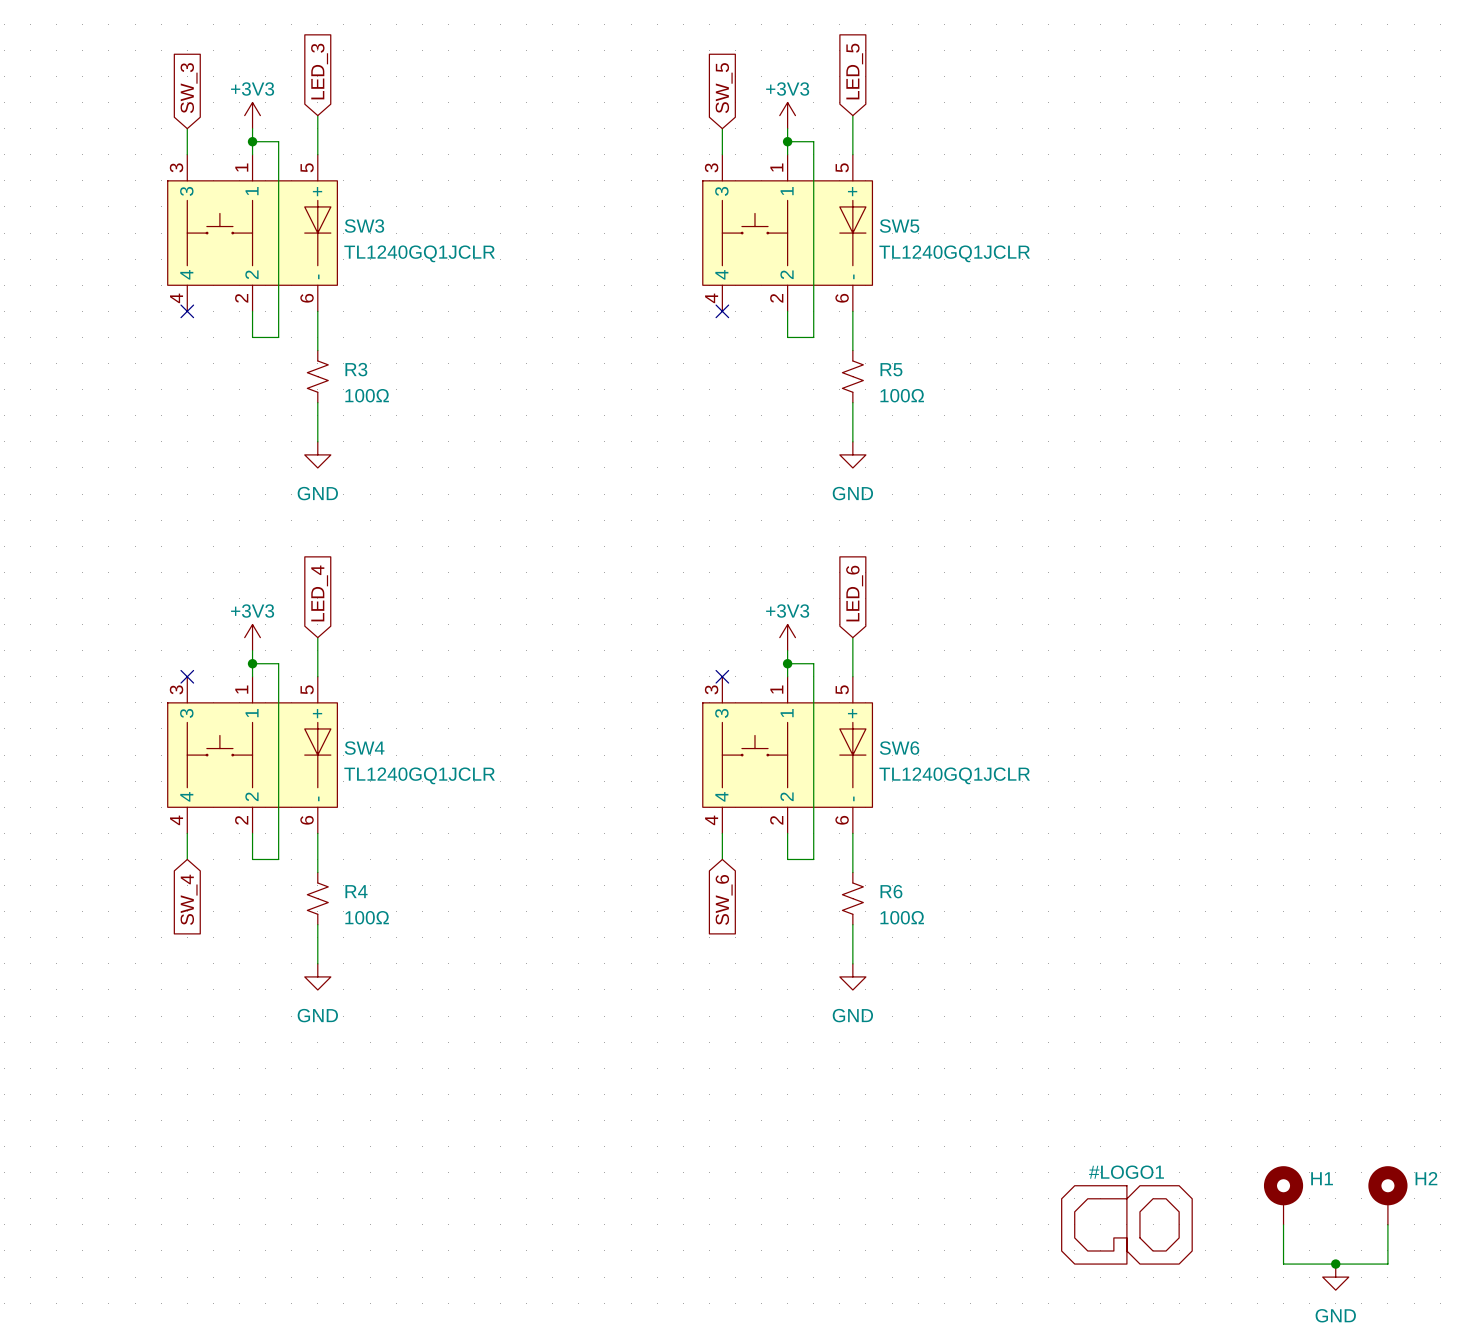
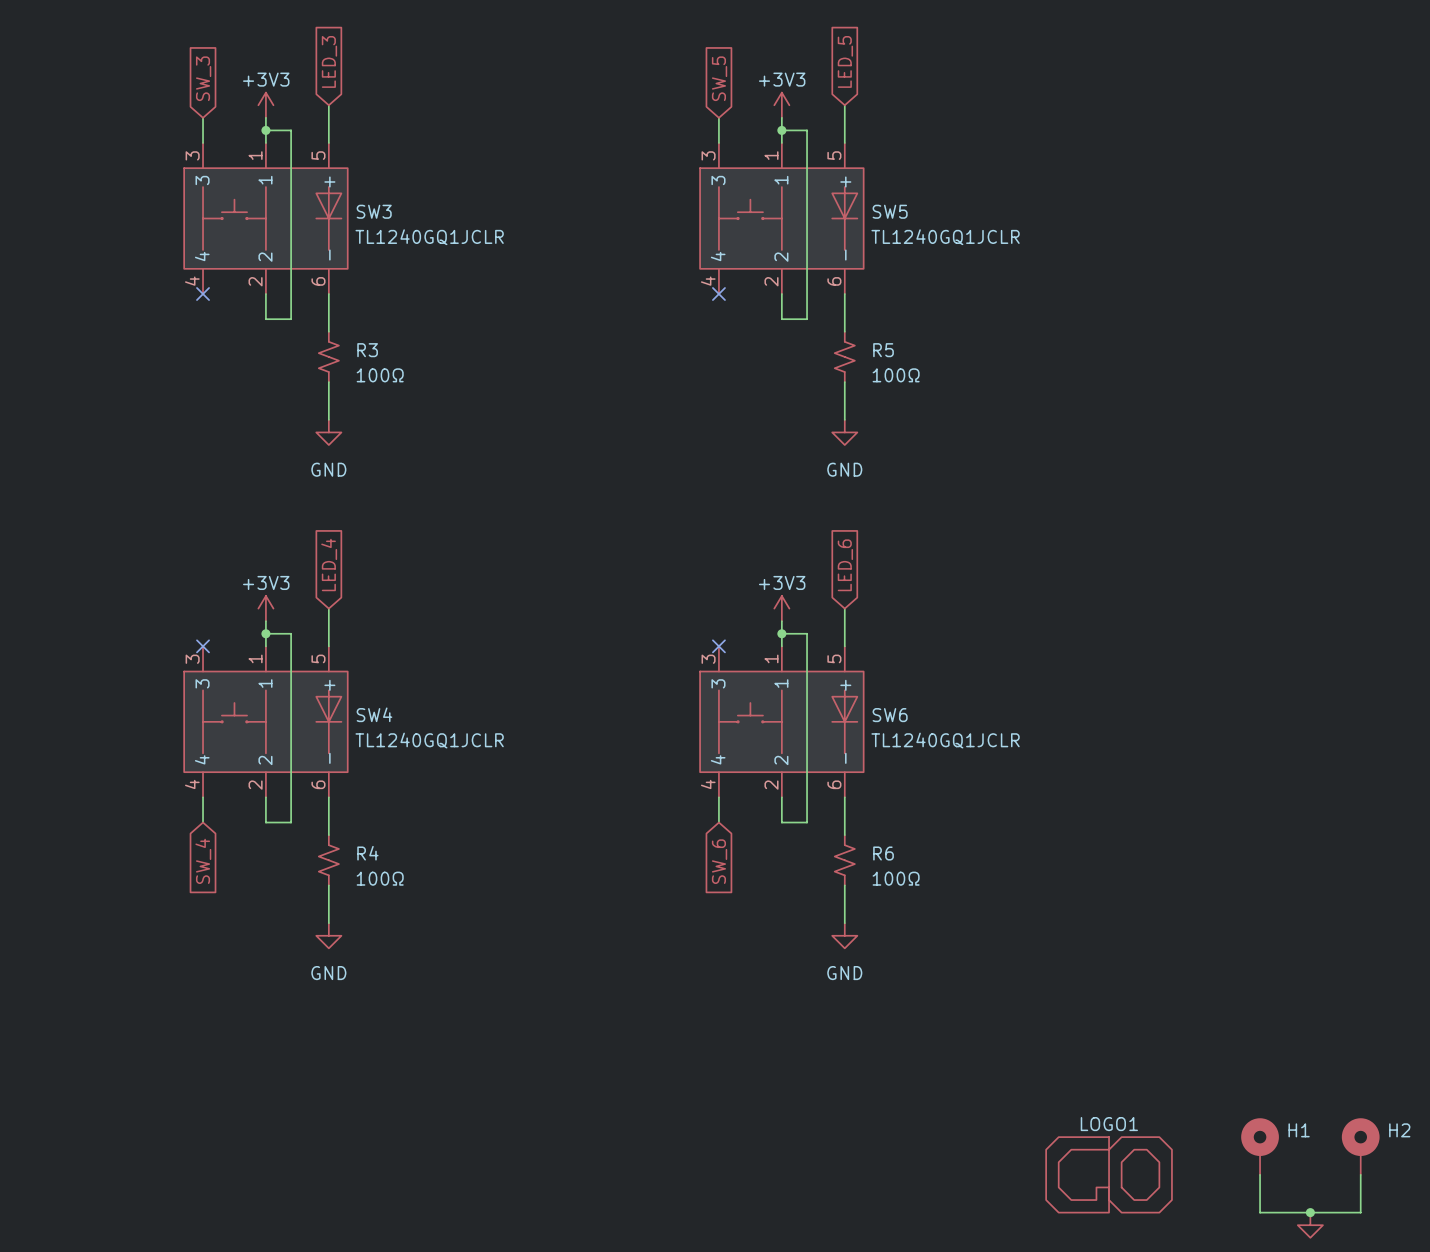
#LOGO1: (1126, 1224) -> none
LOGO1: none -> (1109, 1174)

